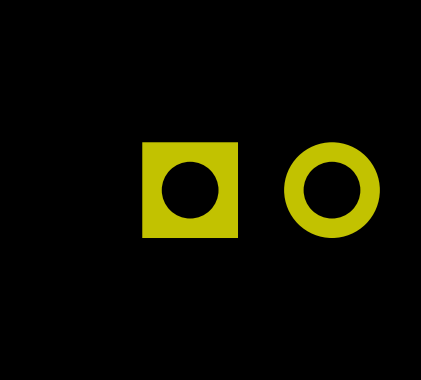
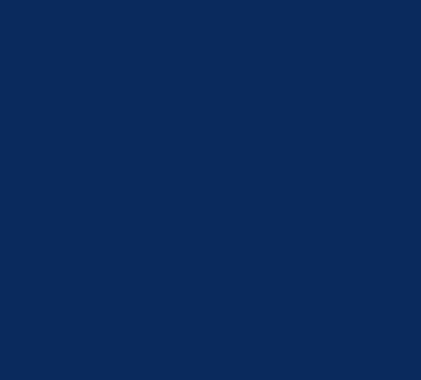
part: (261, 190) -> none

